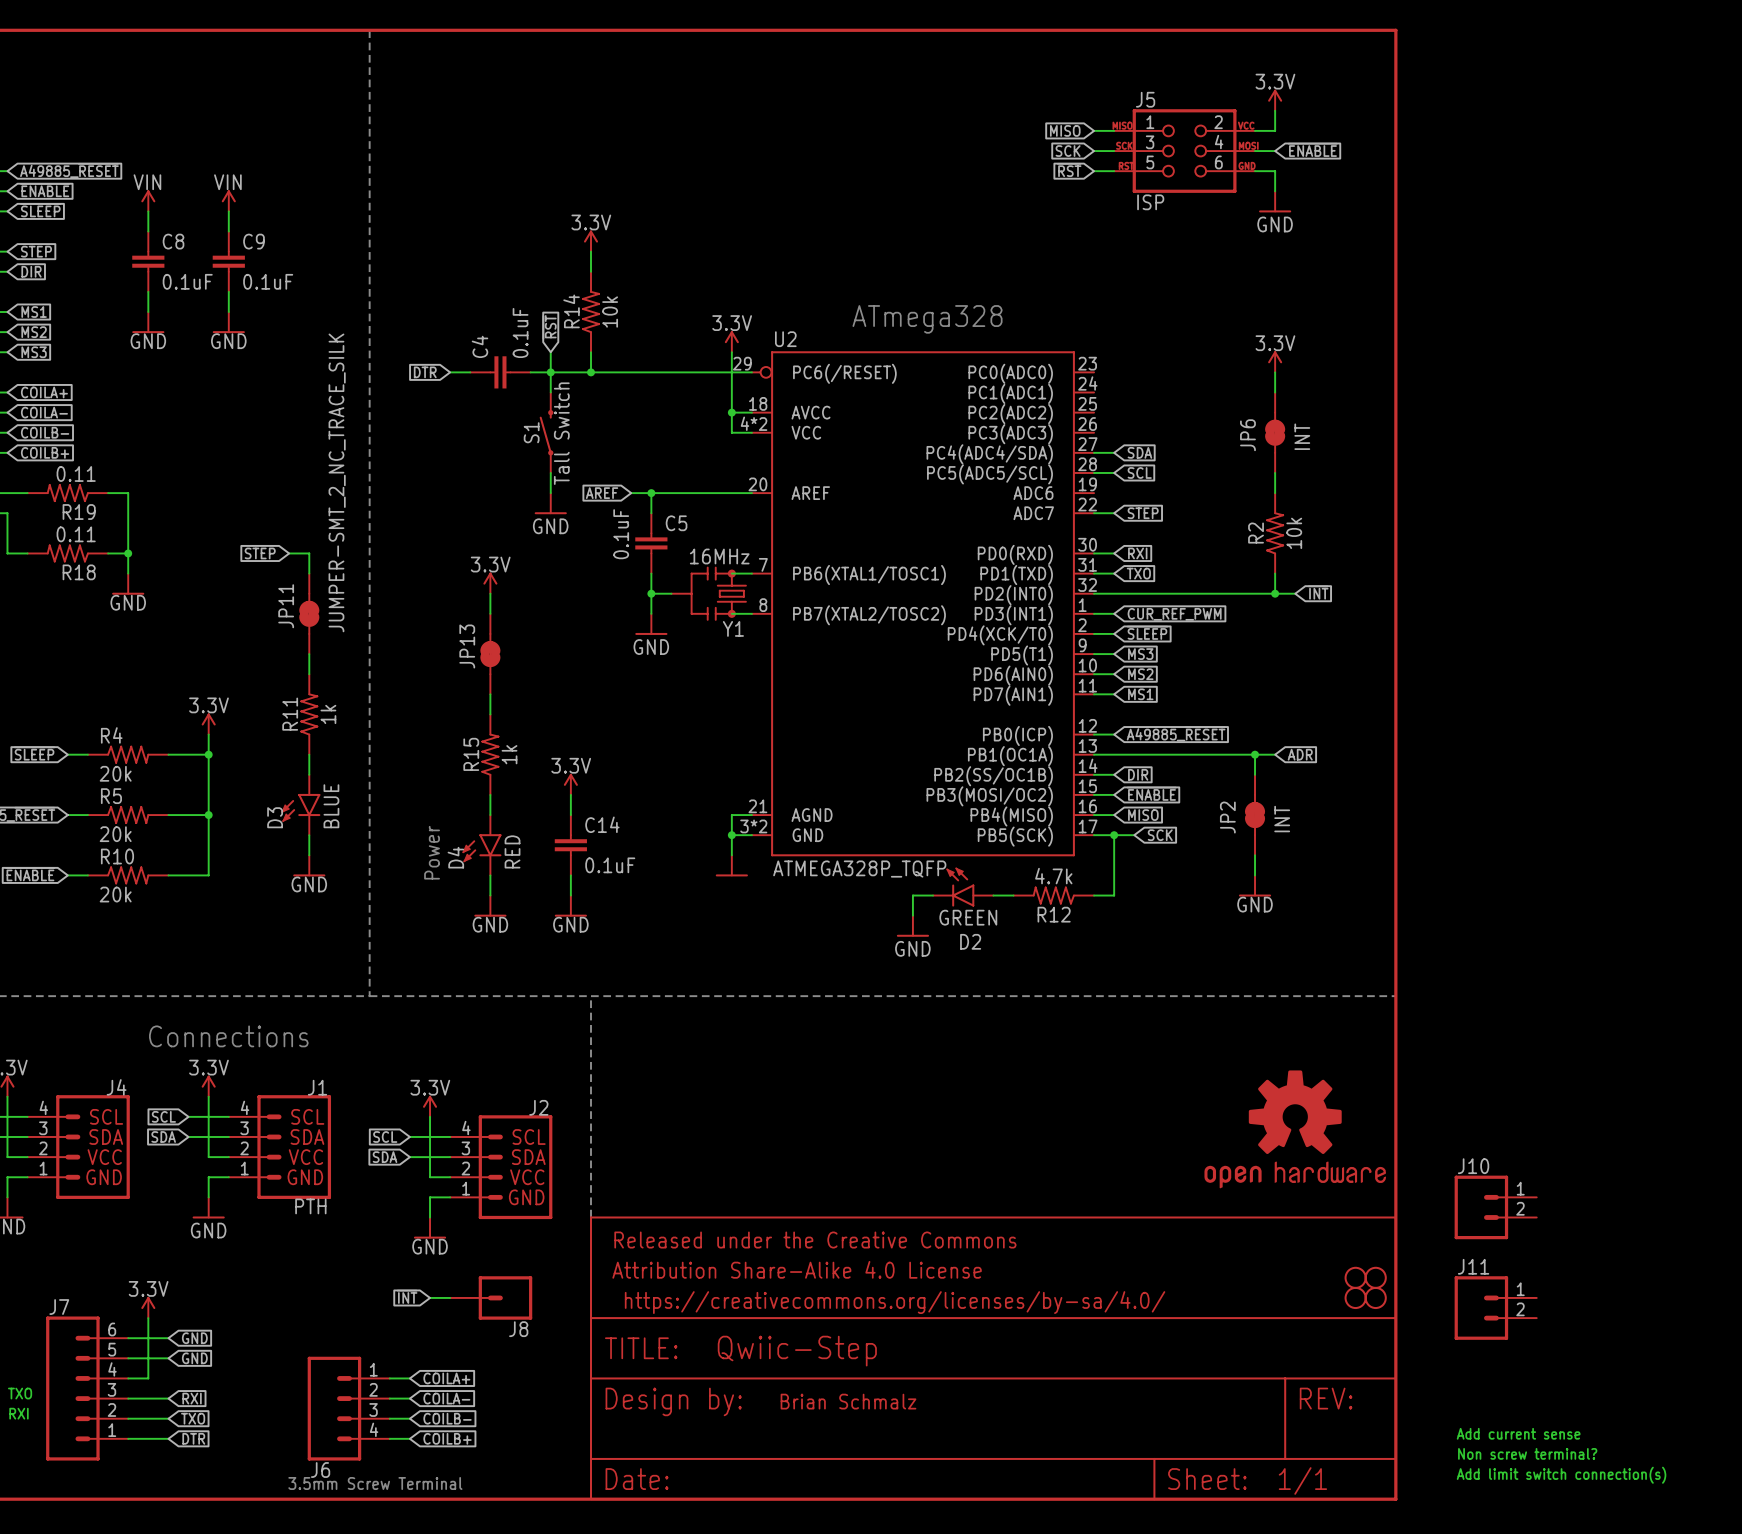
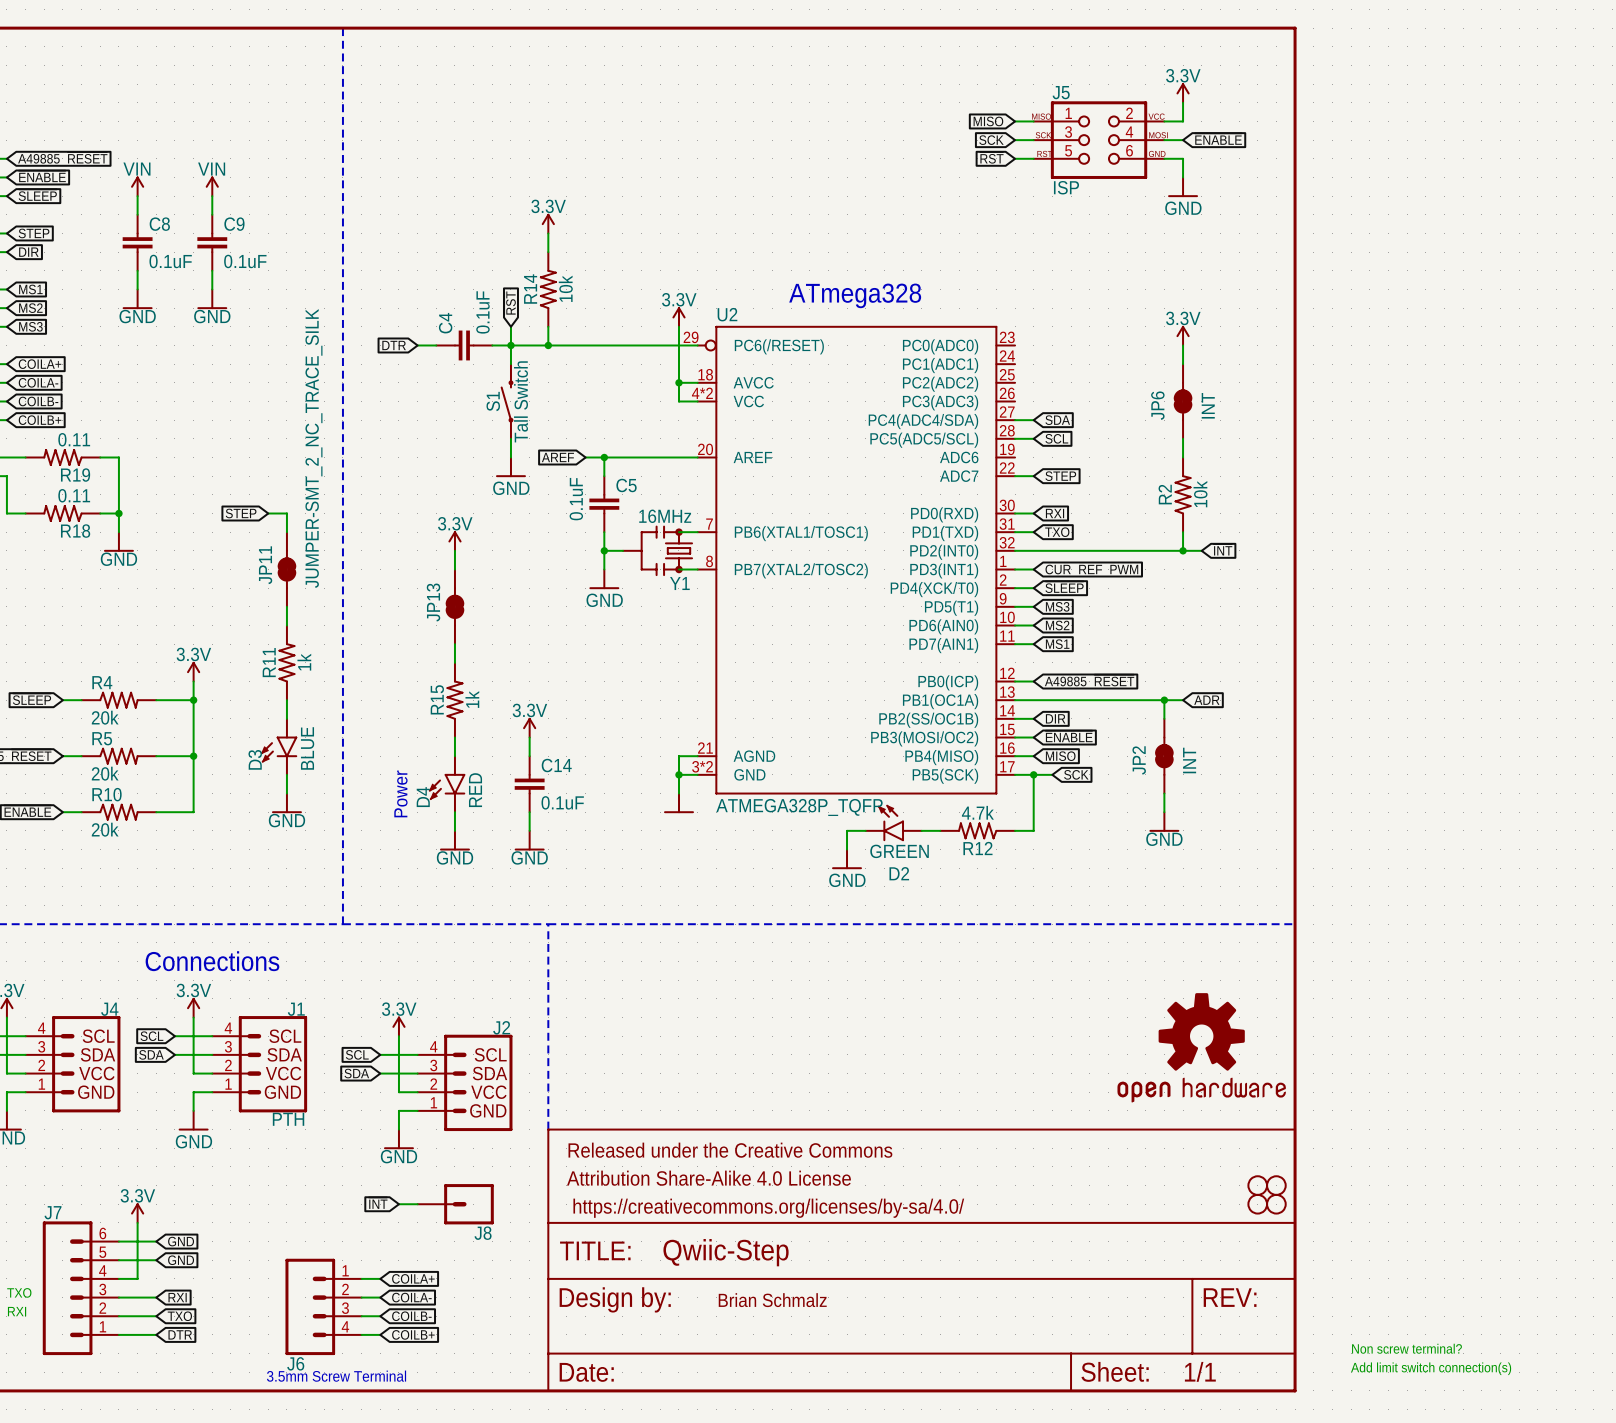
J10: (1495, 1207) -> none
J11: (1495, 1308) -> none
text: Add current sense (1518, 1433) -> none

